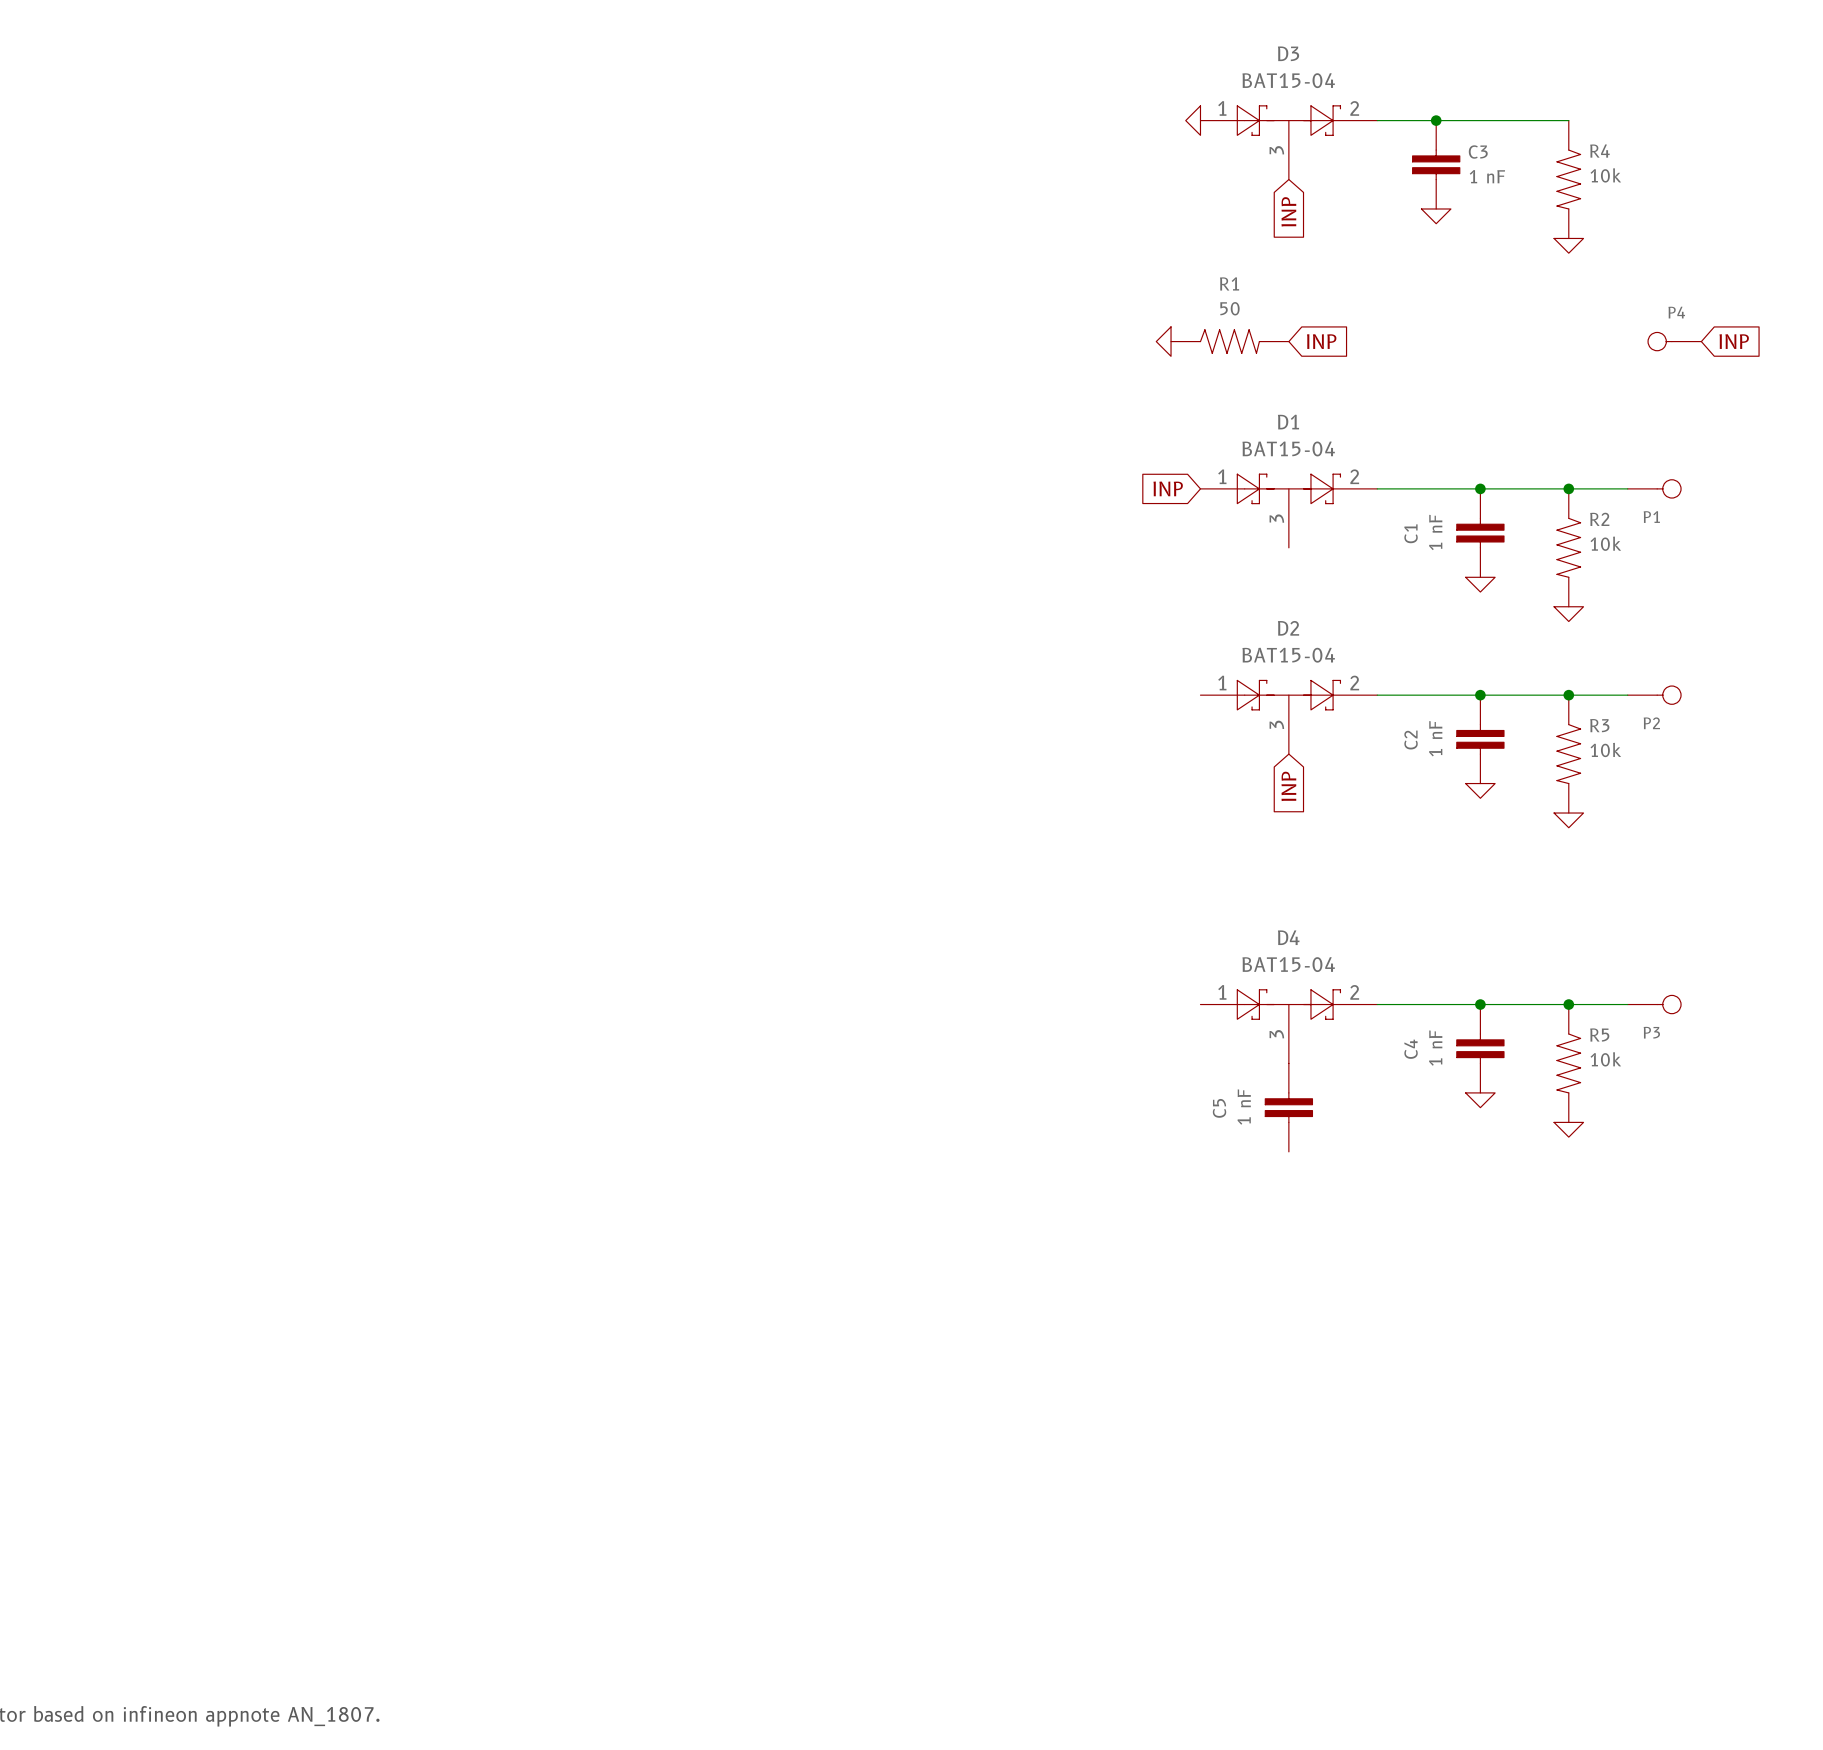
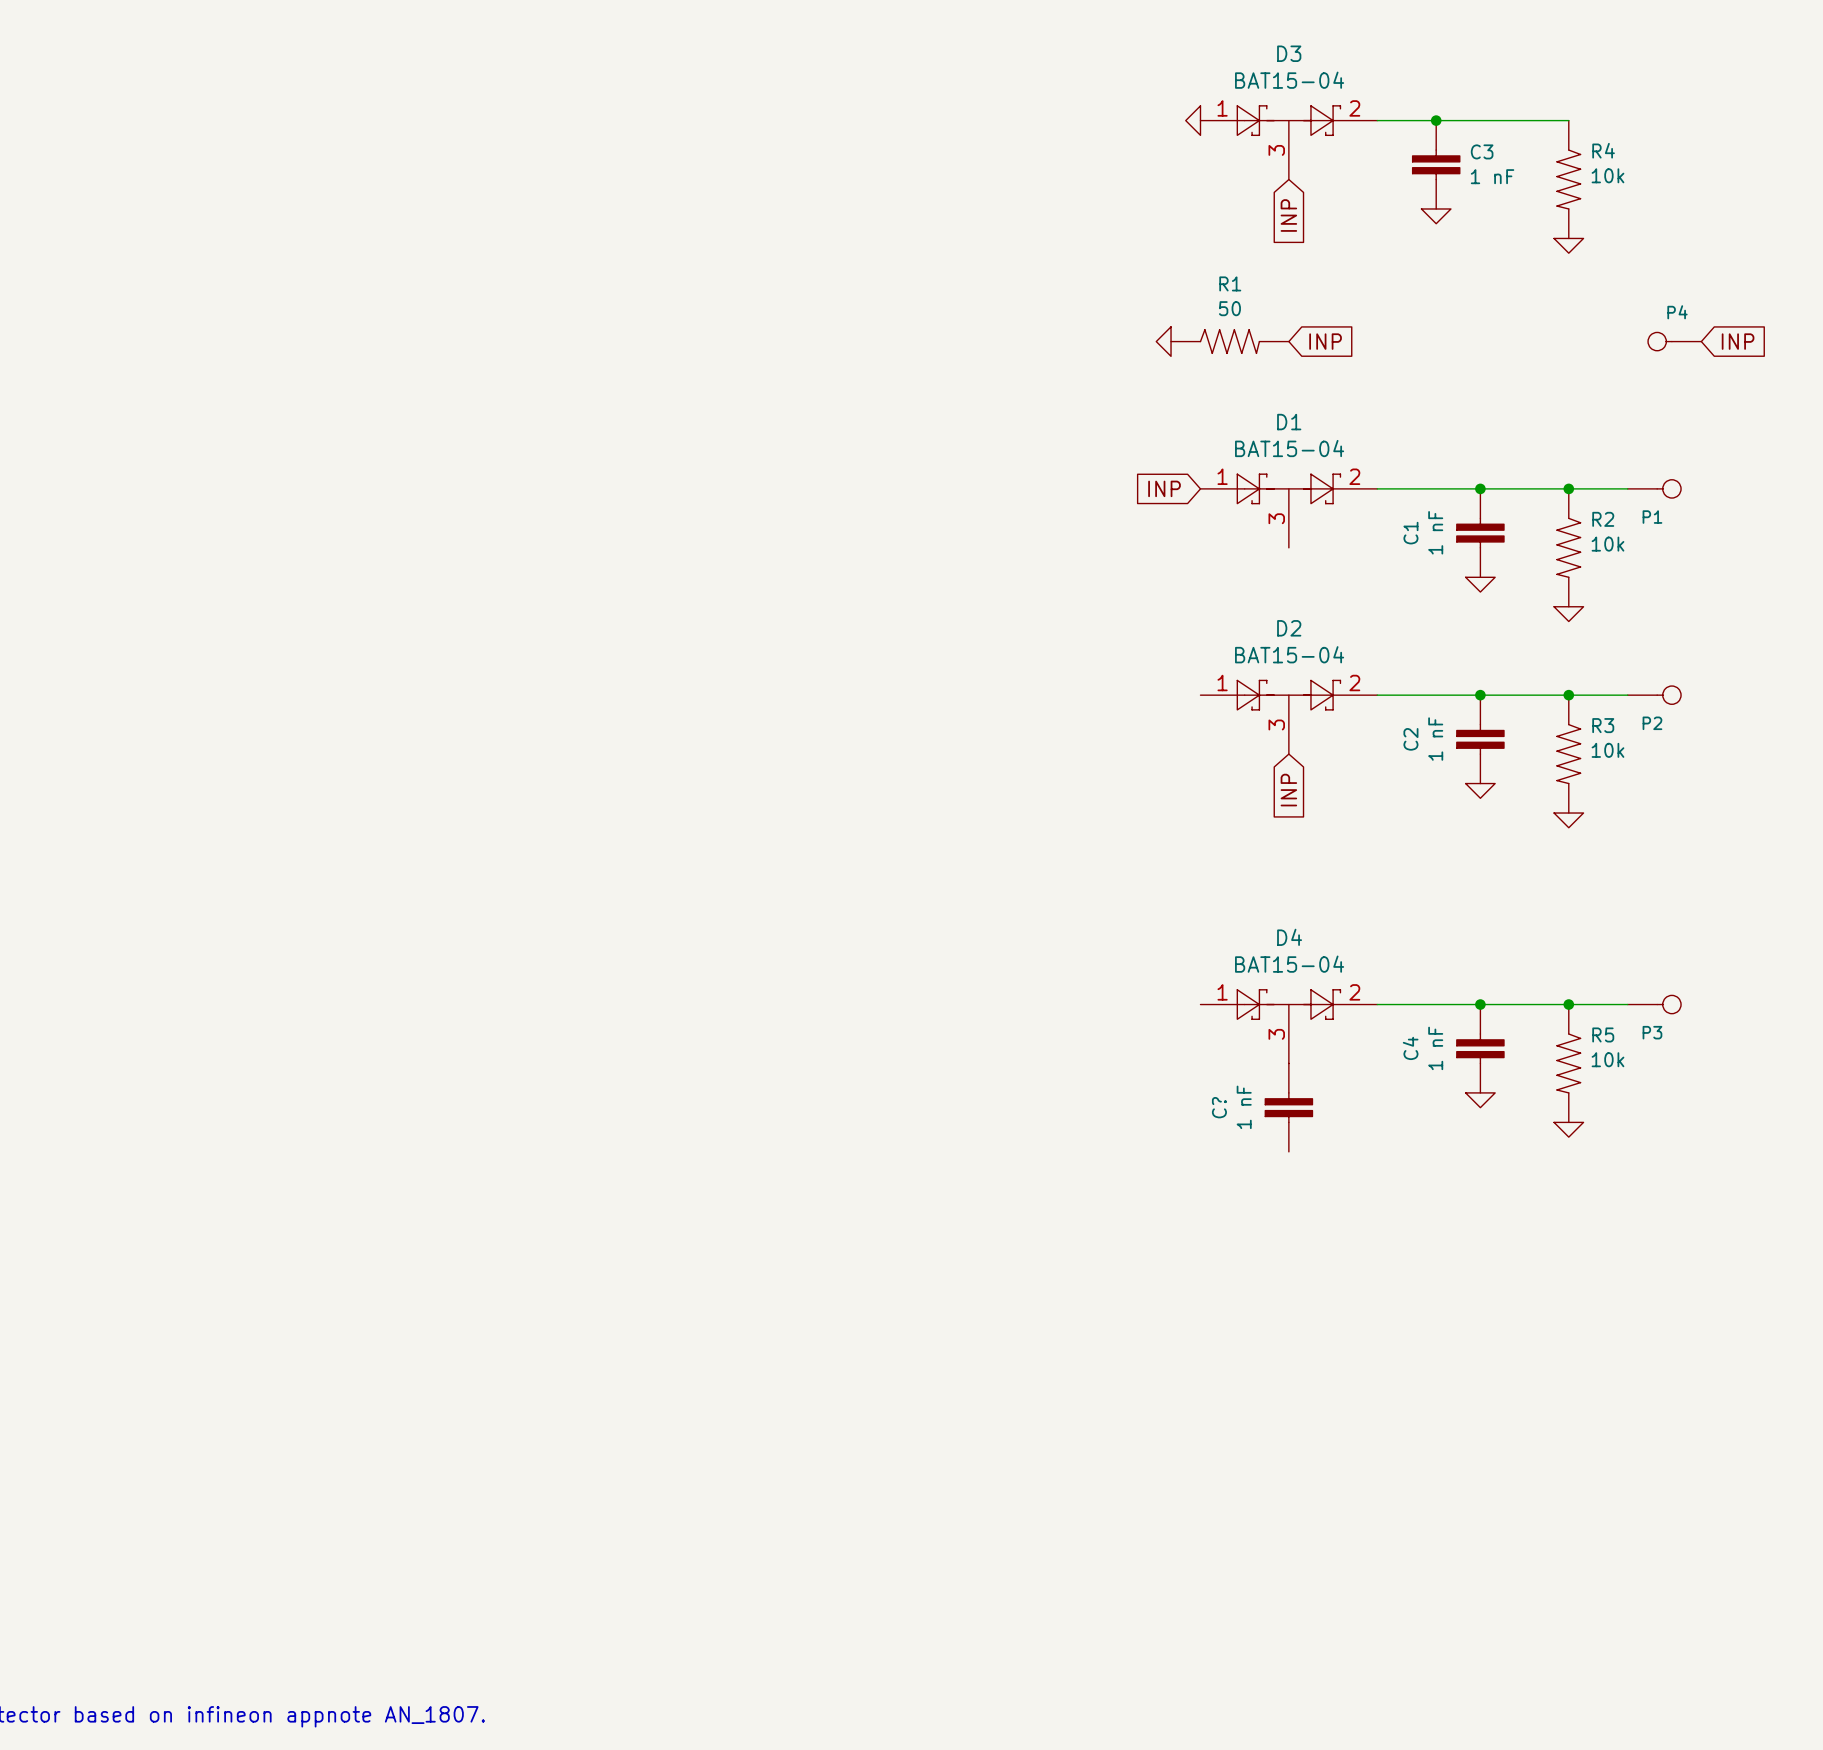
C5 name: C5 (1219, 1108) -> C? (1219, 1107)

